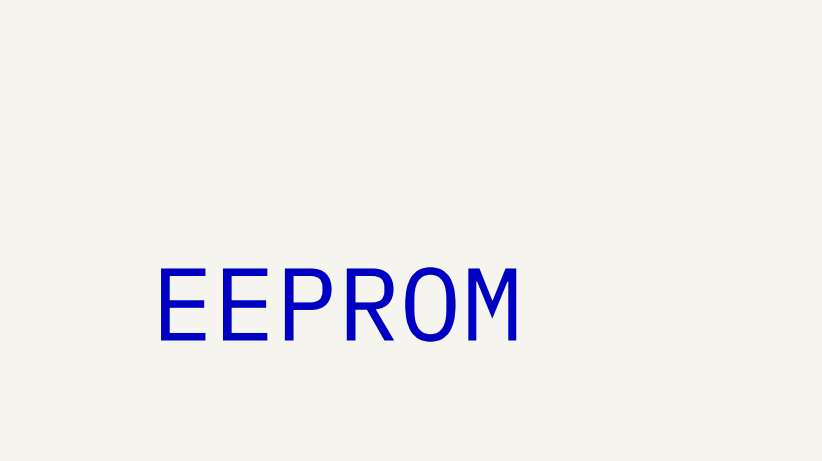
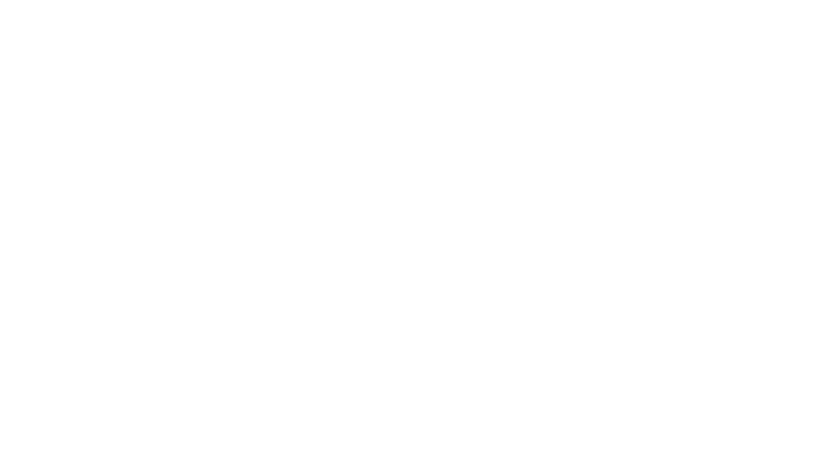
text: EEPROM (338, 304) -> none

